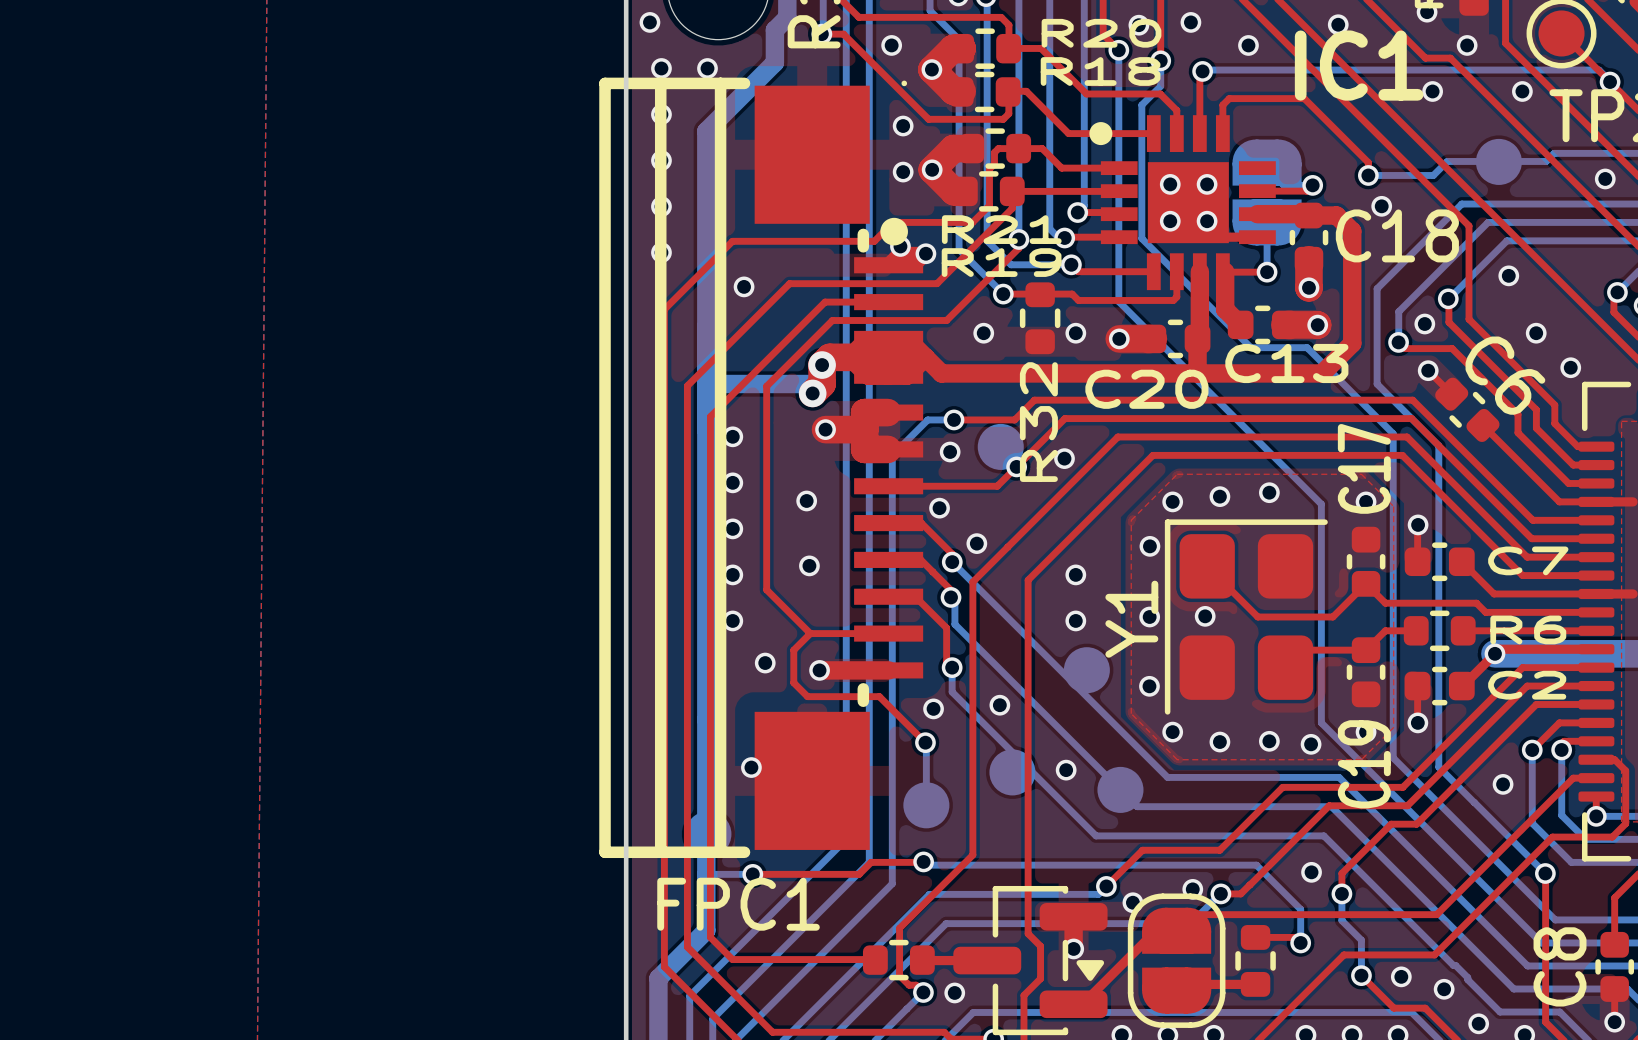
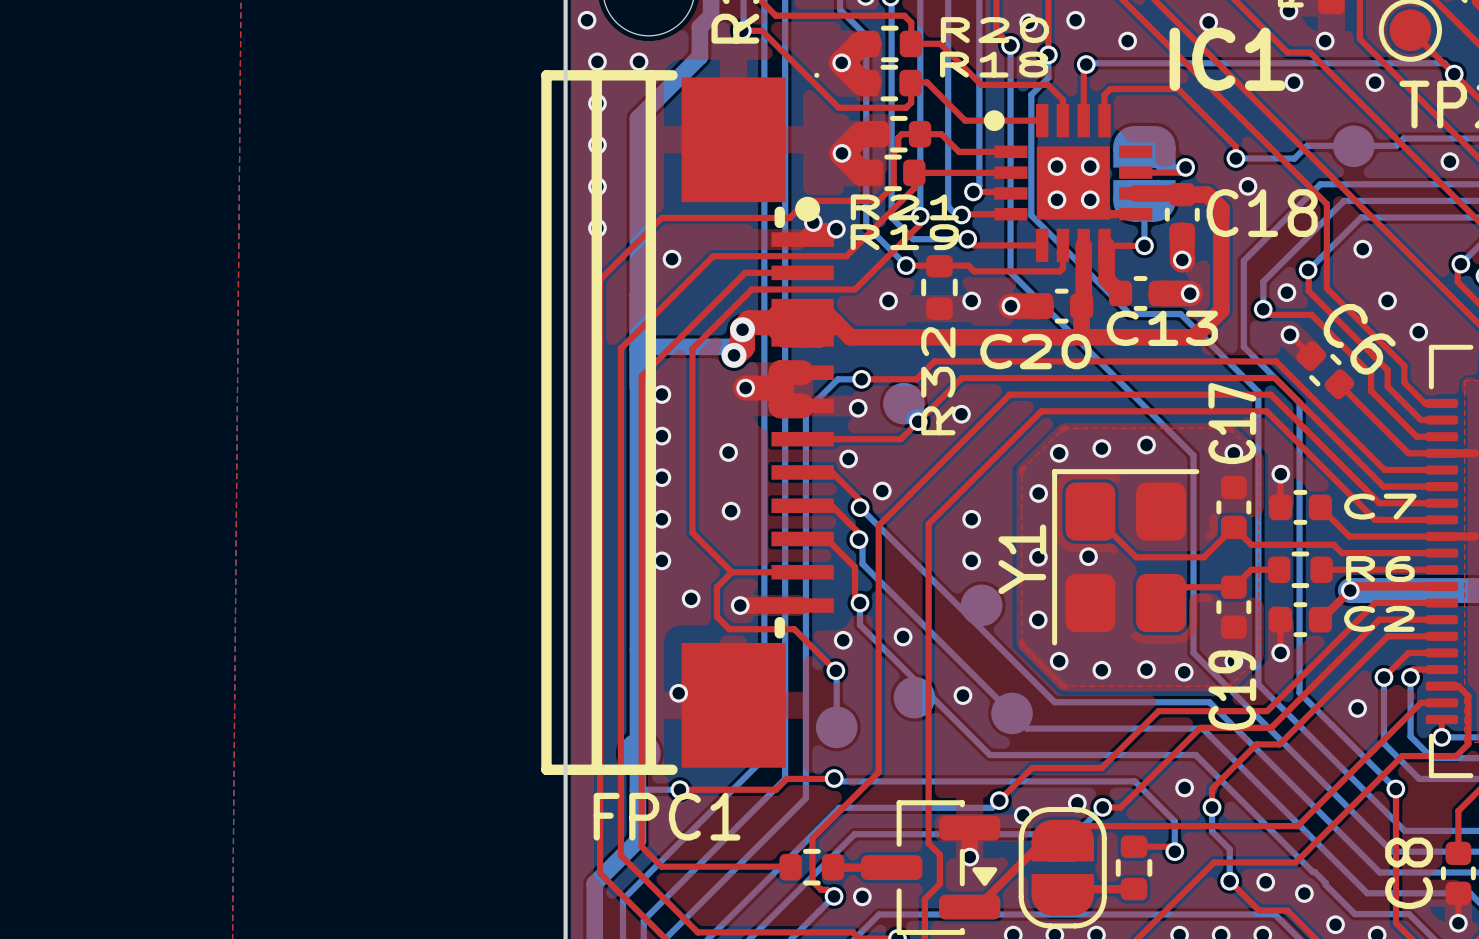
via: (891, 45) -> none
via: (903, 126) -> none
via: (903, 172) -> none

